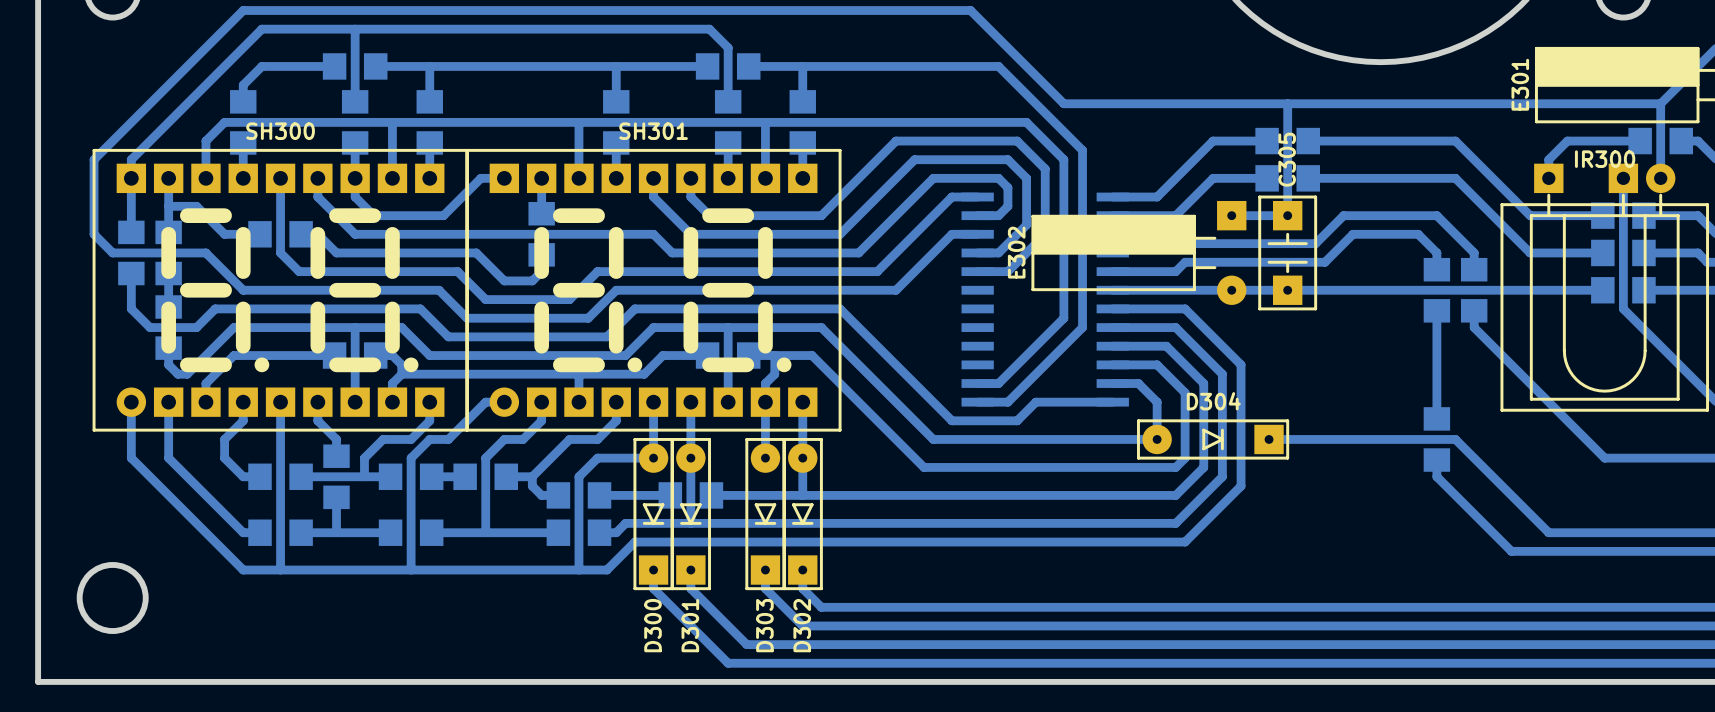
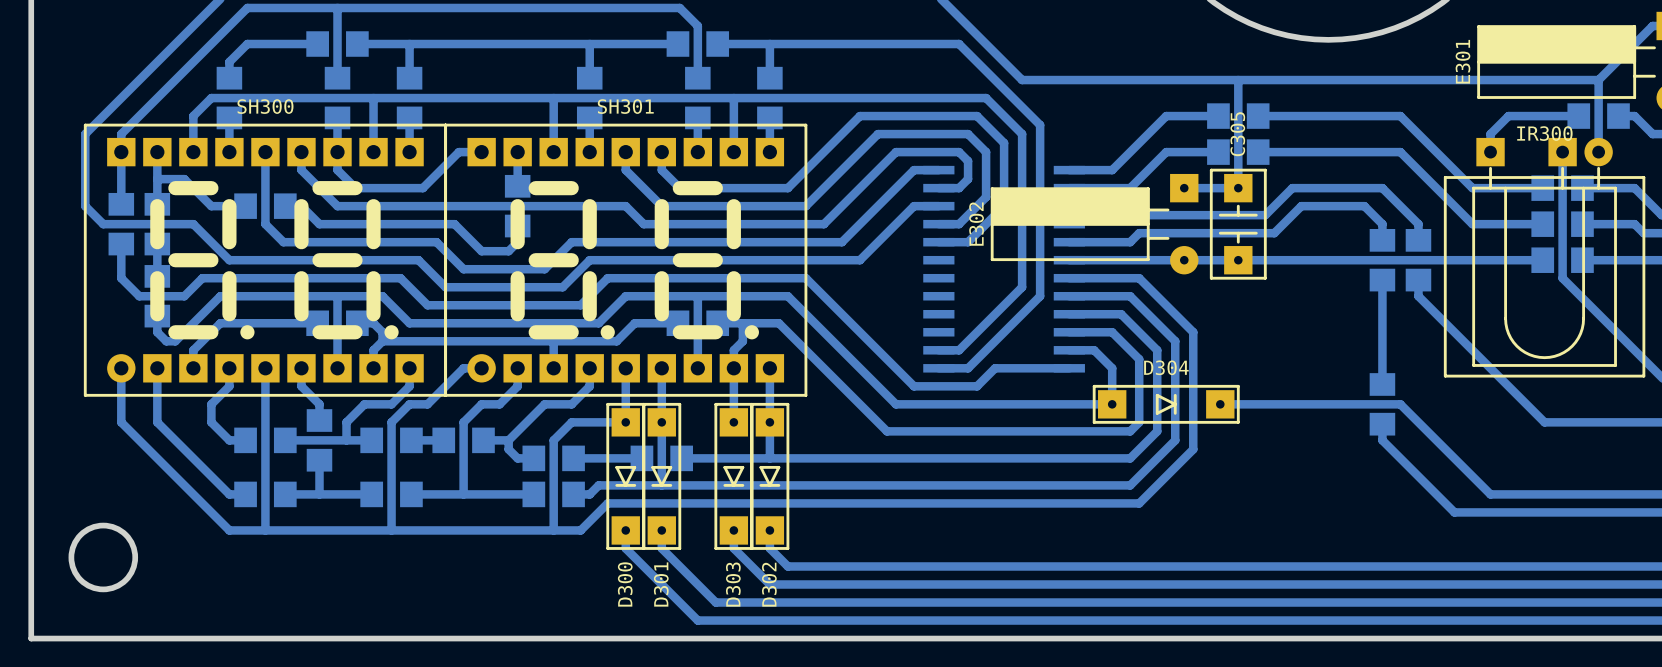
D304 footprint: [1137, 419, 1290, 460] -> [1092, 384, 1240, 424]
D300 footprint: [633, 438, 674, 591] -> [606, 402, 646, 550]
D301 footprint: [670, 438, 711, 591] -> [642, 402, 682, 550]
D303 footprint: [745, 438, 786, 591] -> [714, 402, 754, 550]
D302 footprint: [782, 438, 823, 591] -> [750, 402, 790, 550]

